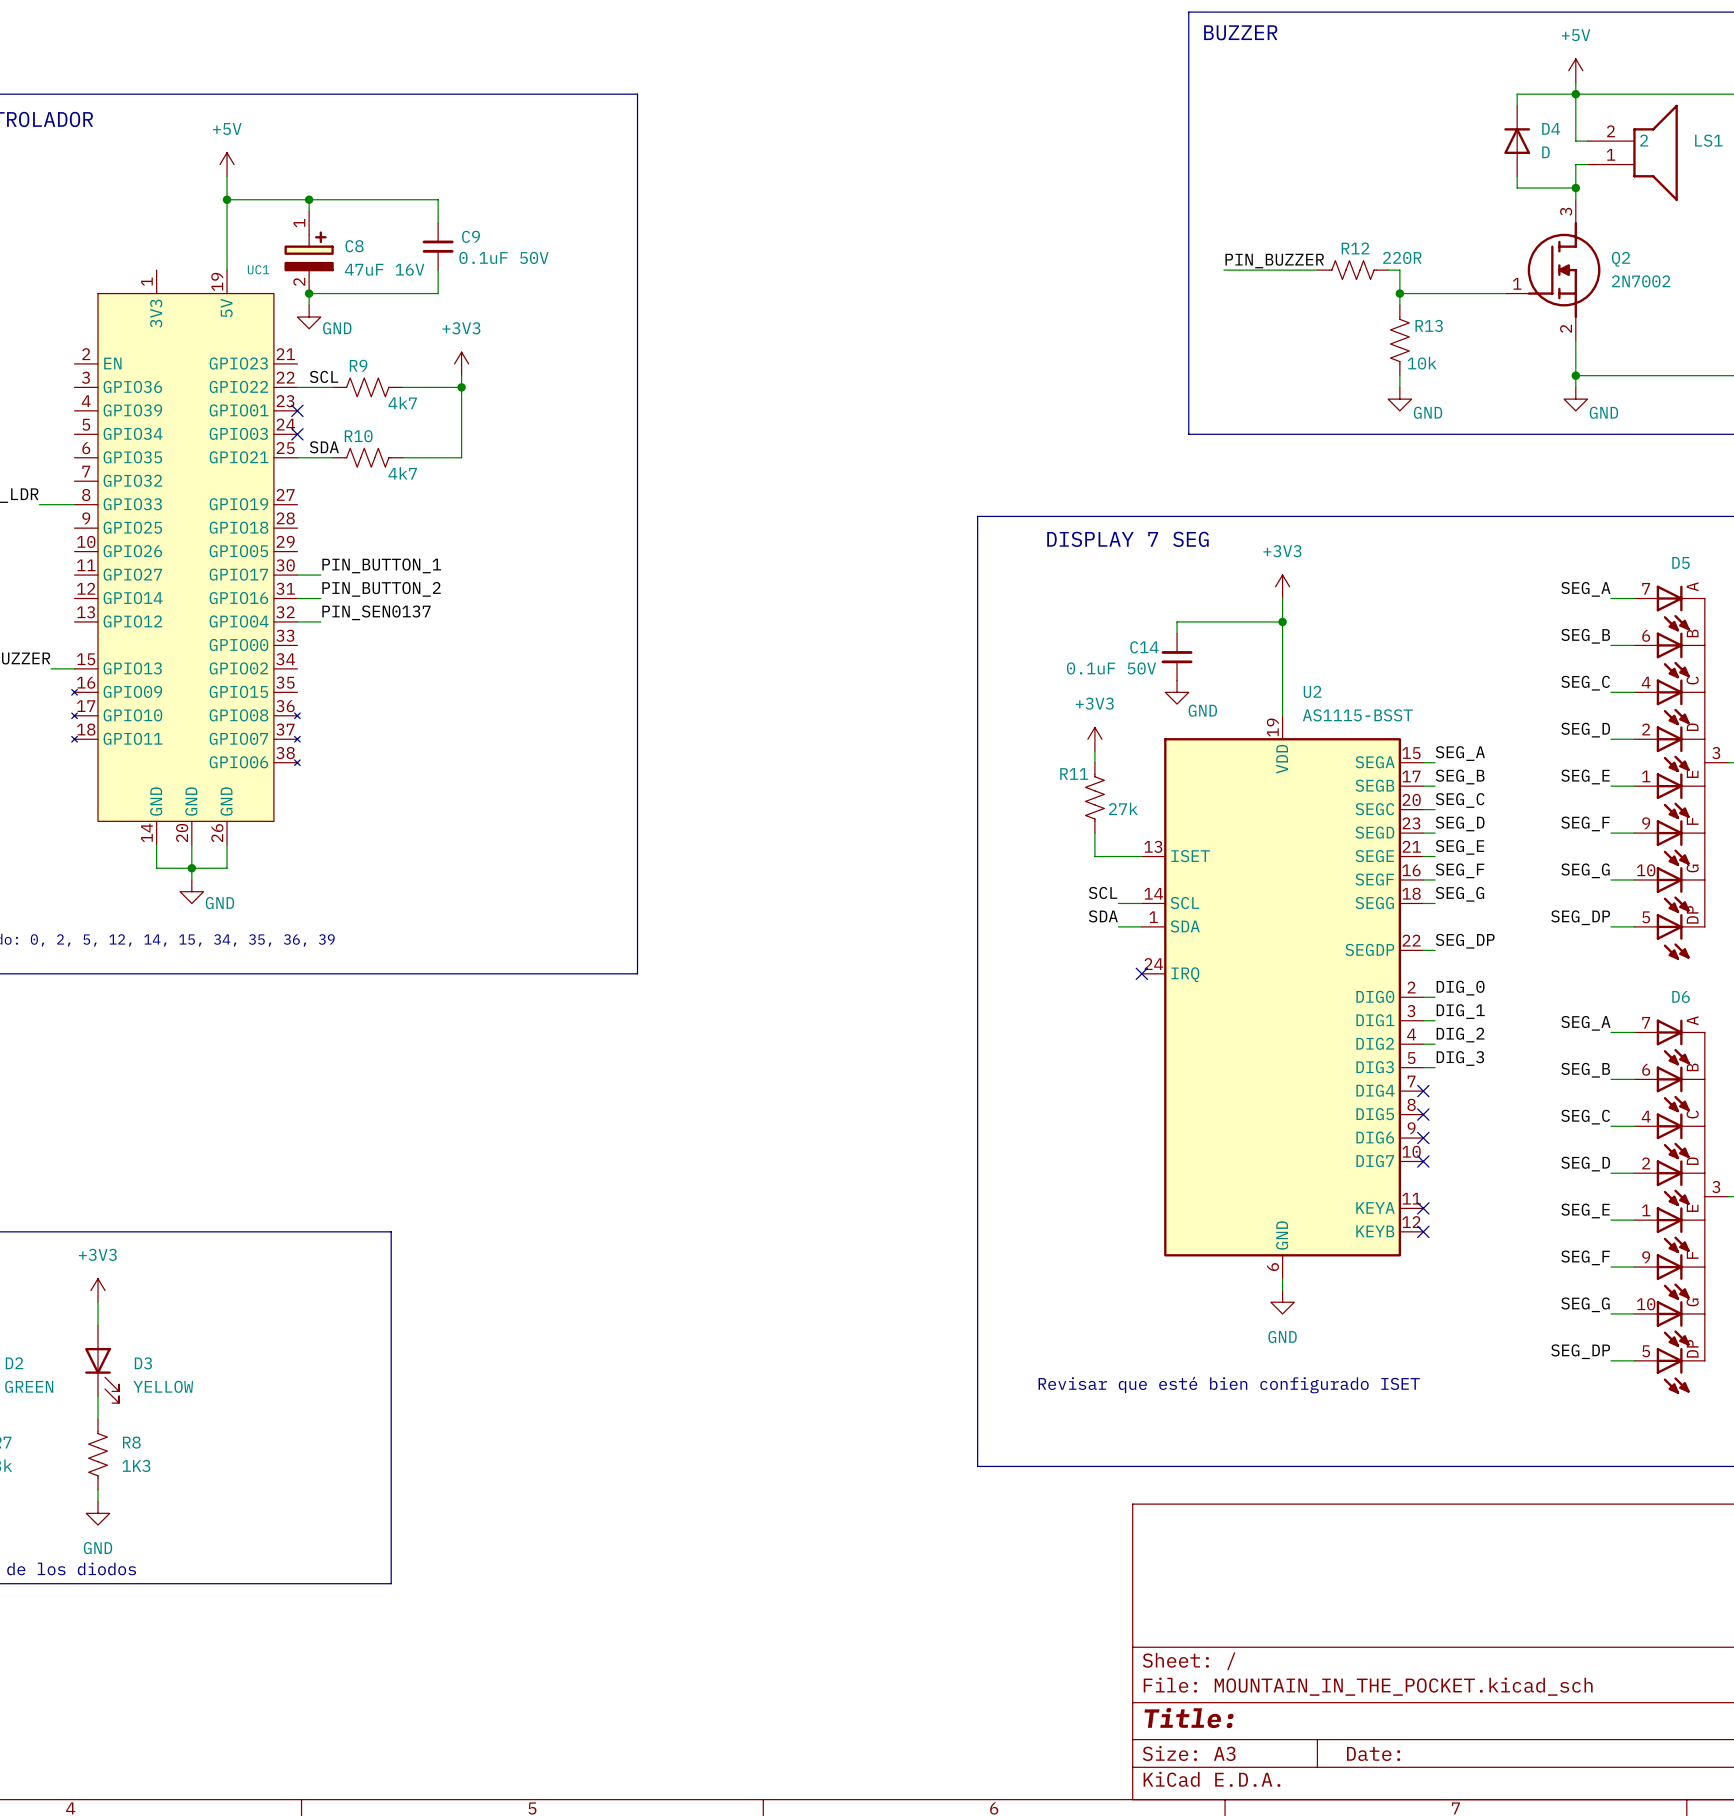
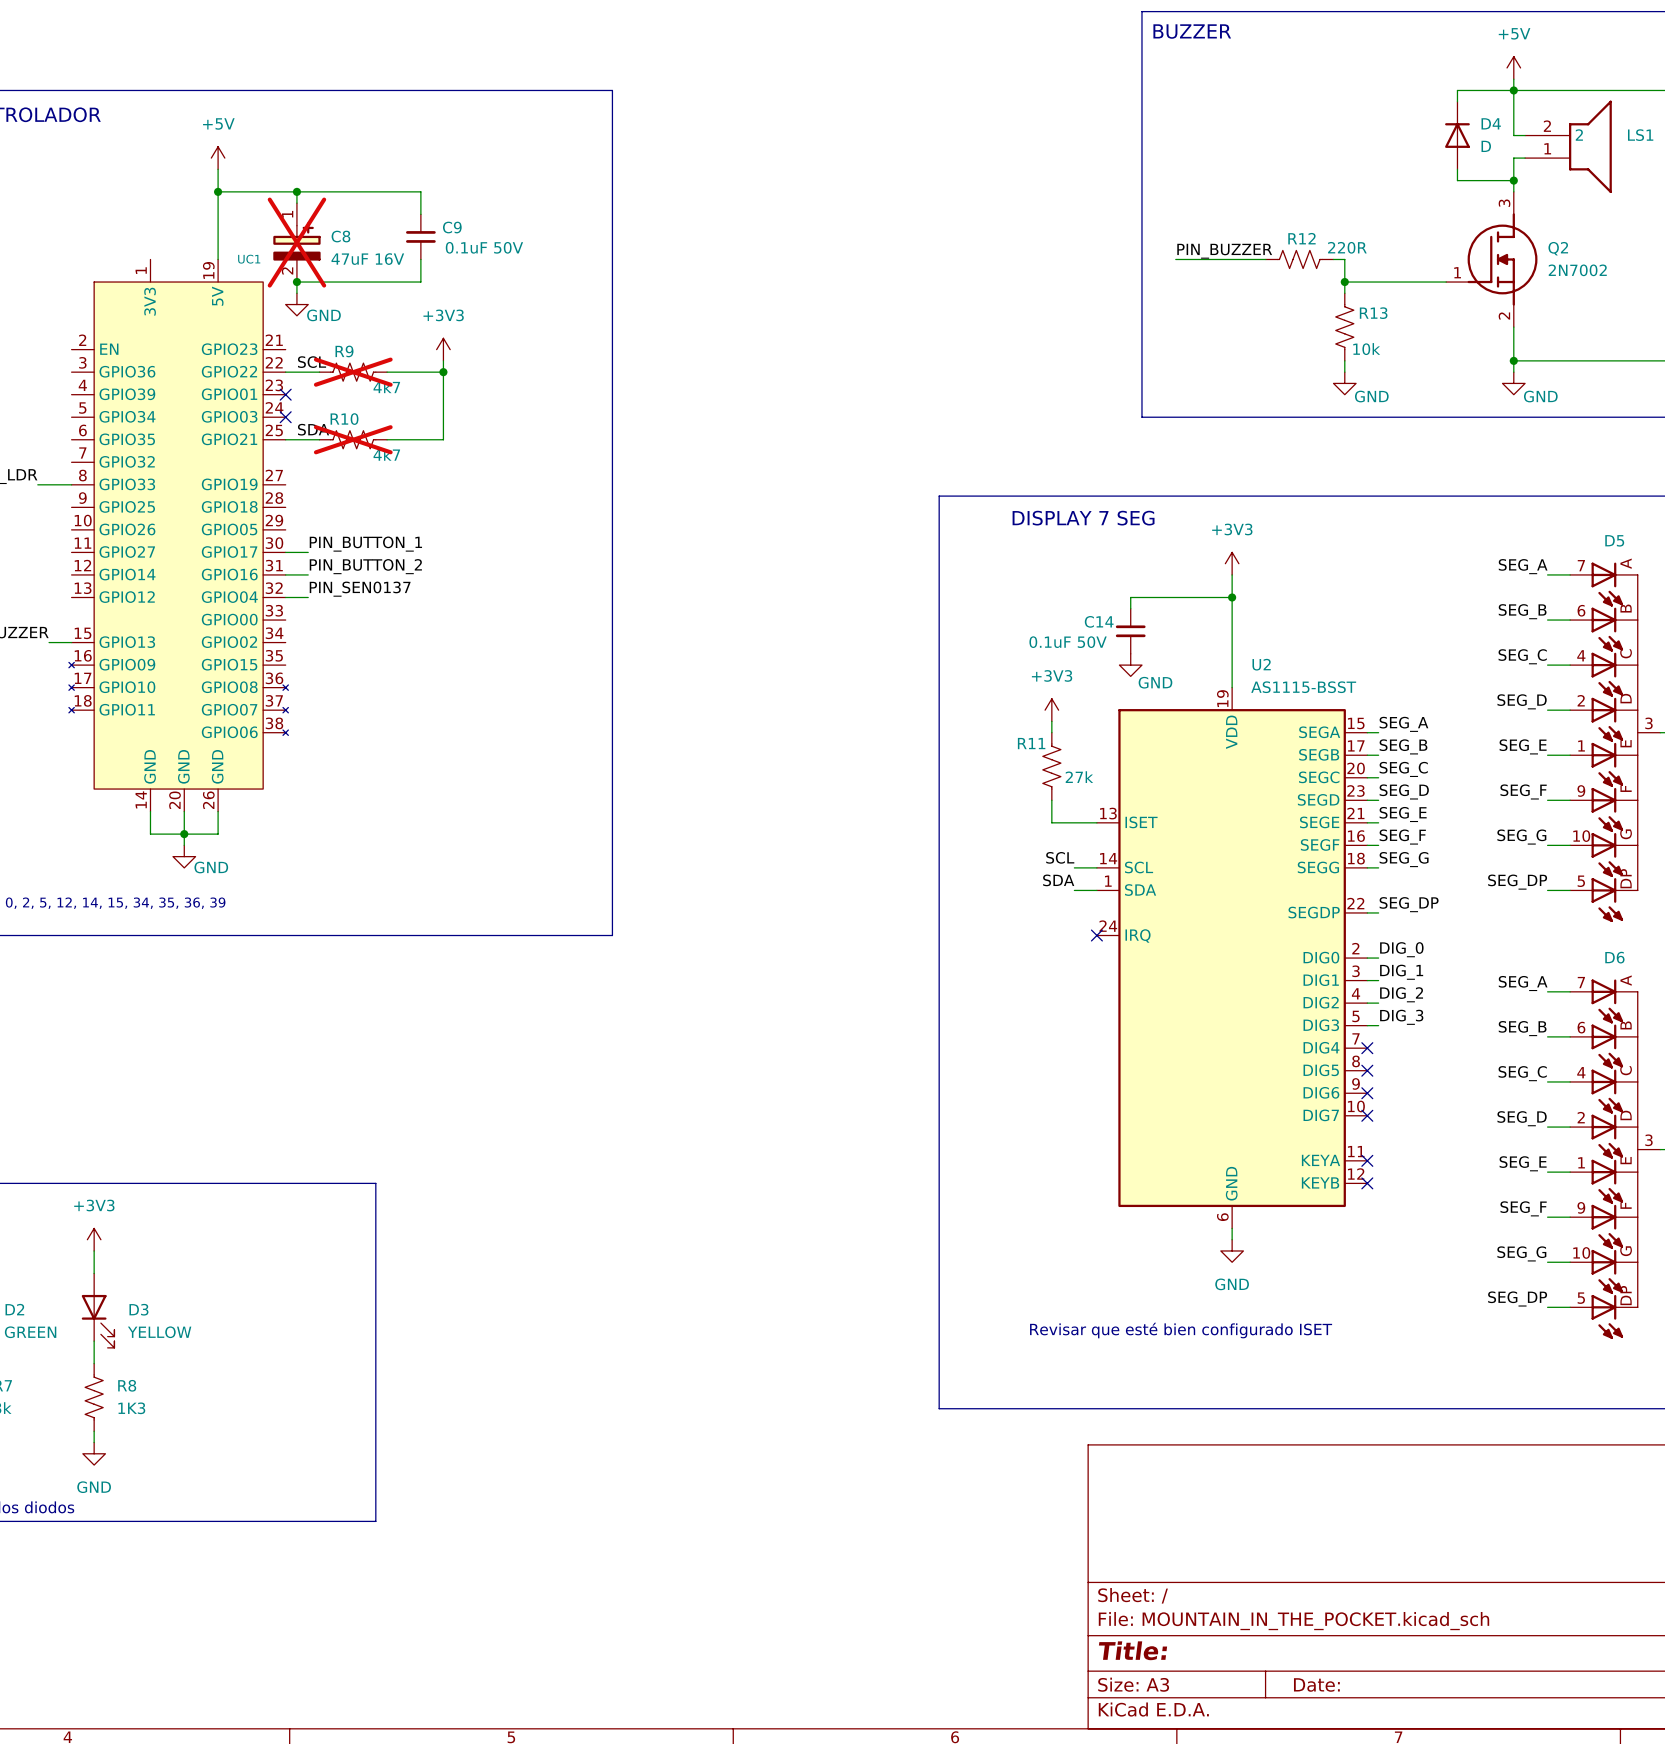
C8 do-not-place cross: none -> (296, 242)
R9 do-not-place cross: none -> (353, 372)
R10 do-not-place cross: none -> (353, 439)

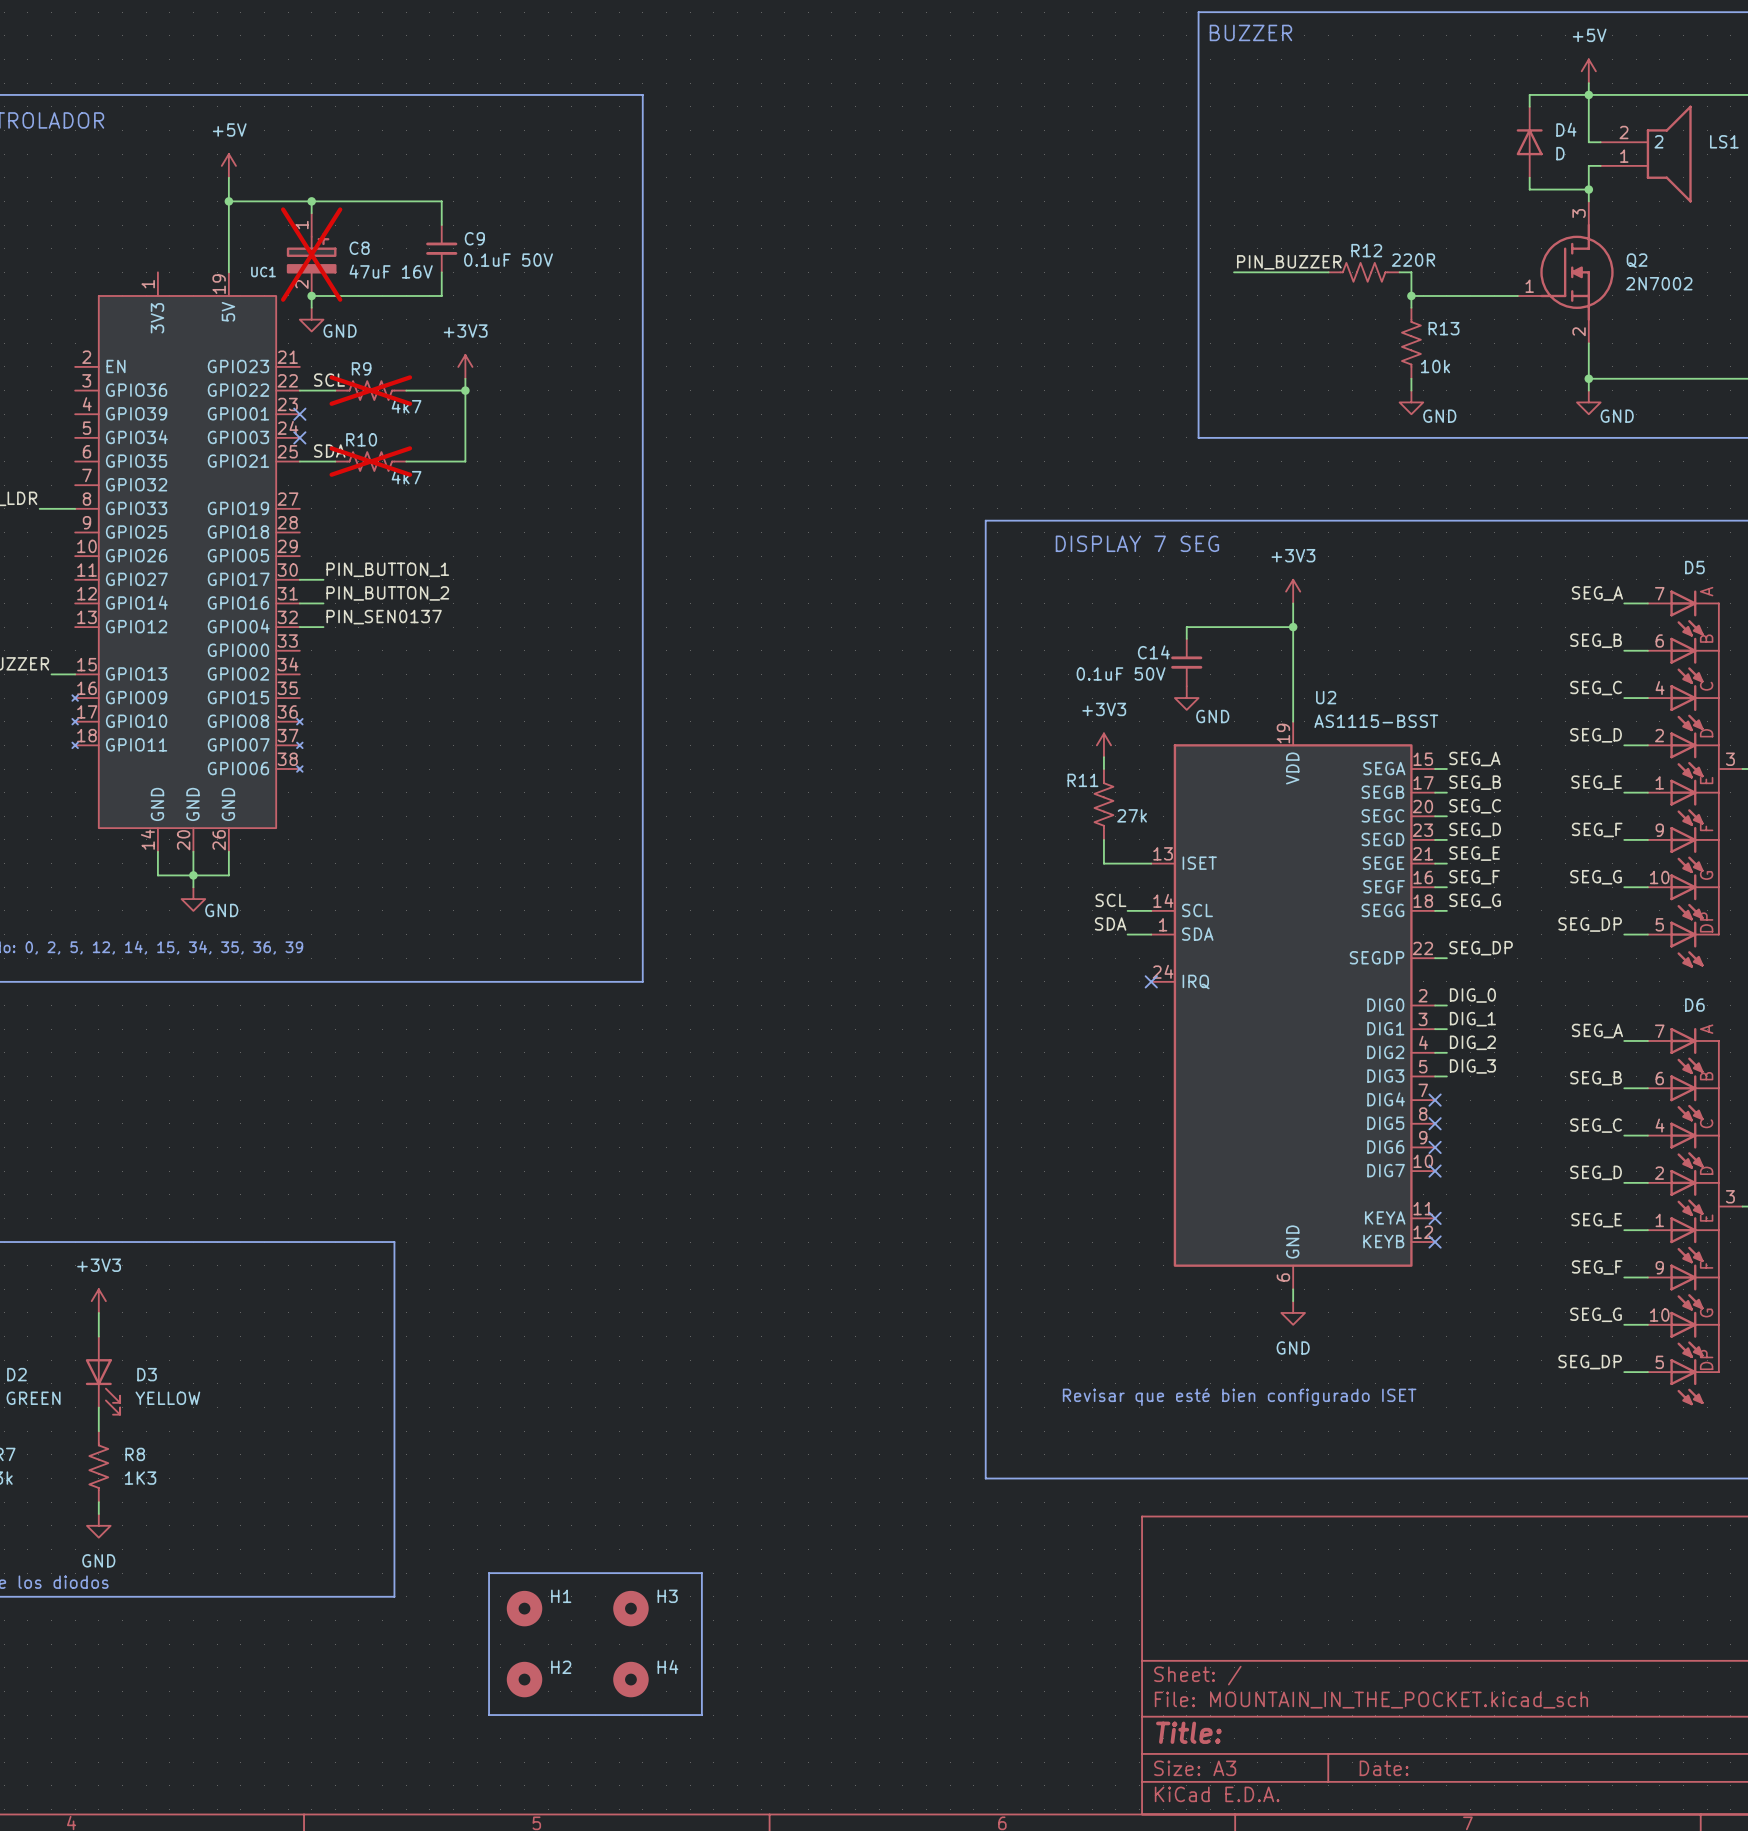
line: none -> (489, 1573) (701, 1573) (701, 1715) (489, 1715) (489, 1573)
H1: none -> (524, 1608)
H3: none -> (630, 1608)
H2: none -> (524, 1679)
H4: none -> (630, 1679)

